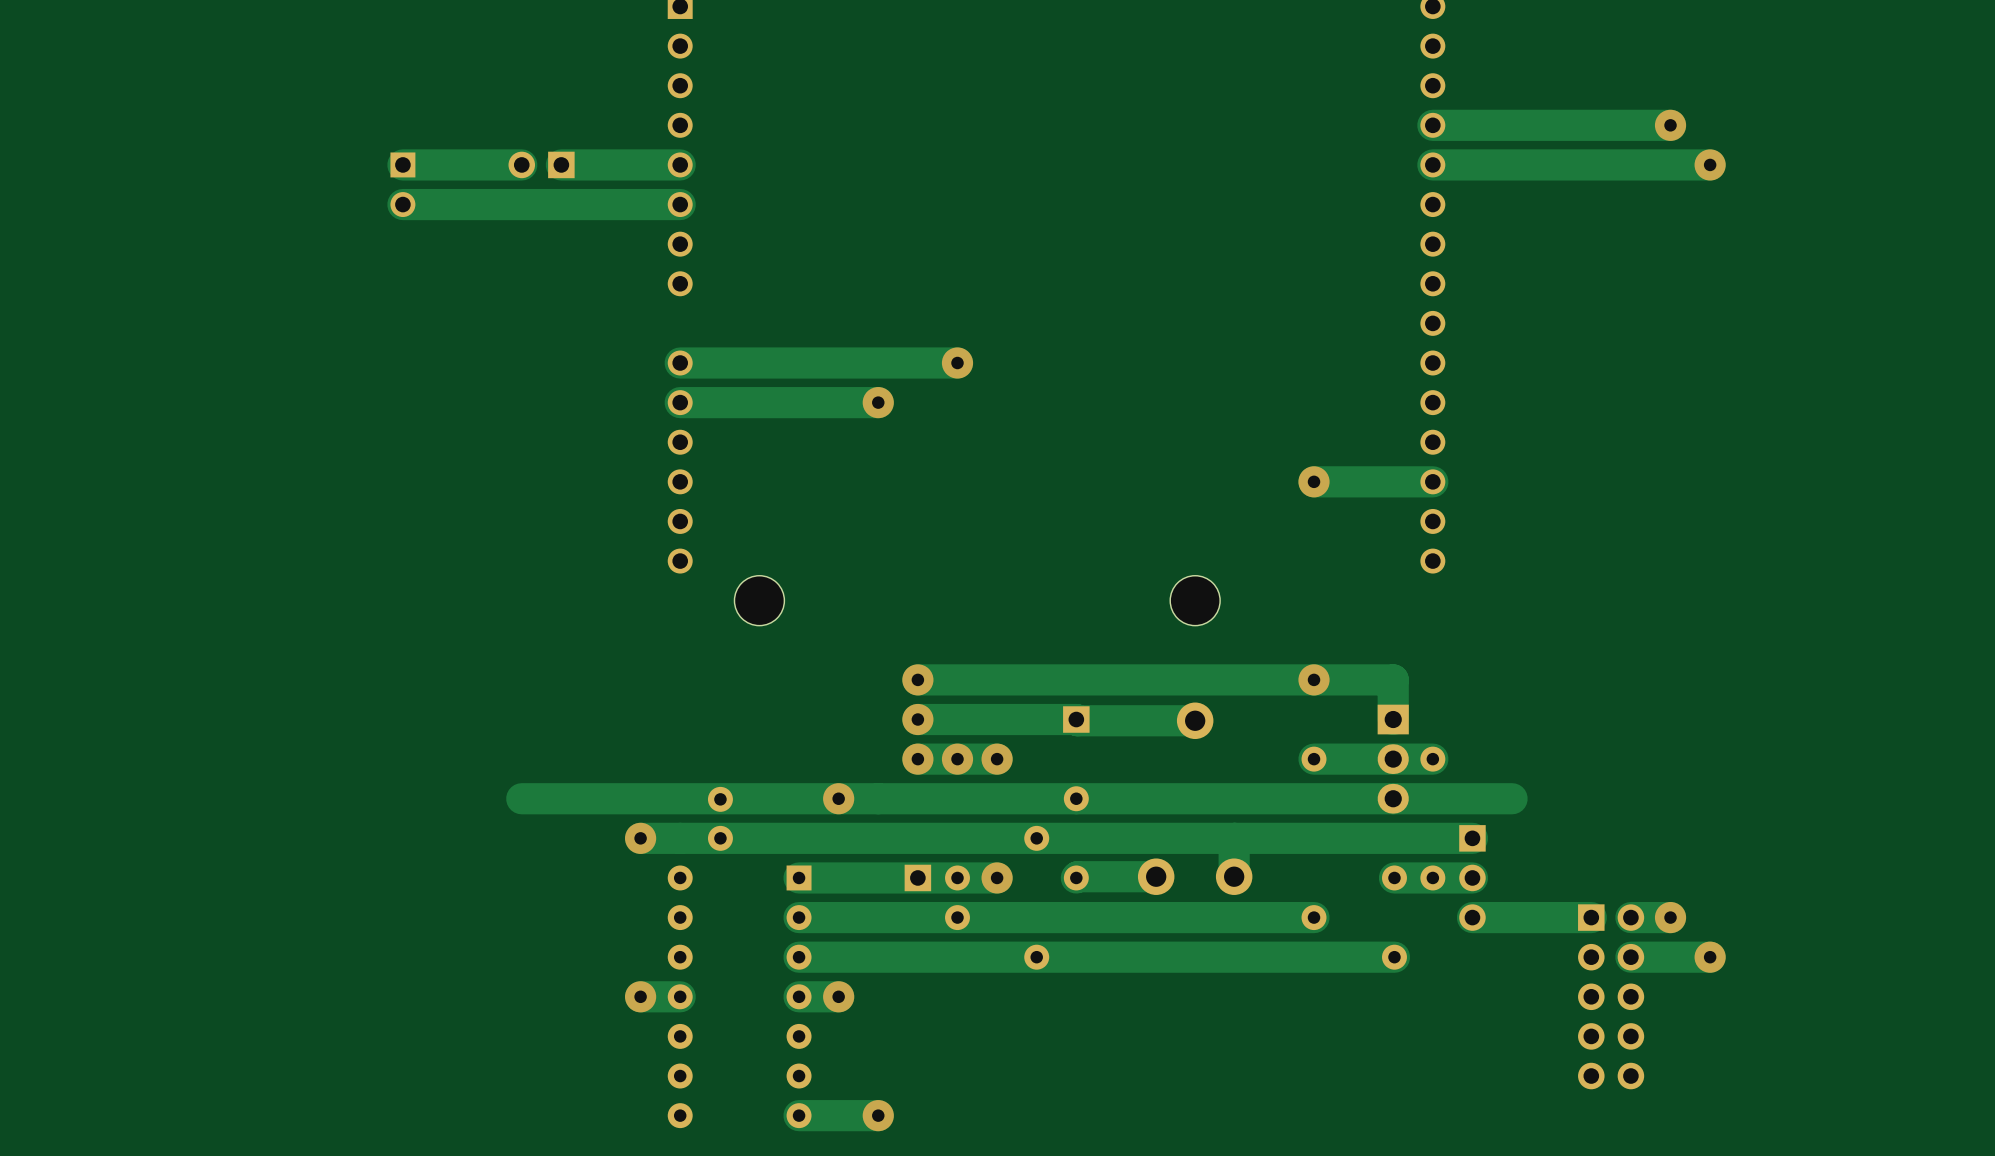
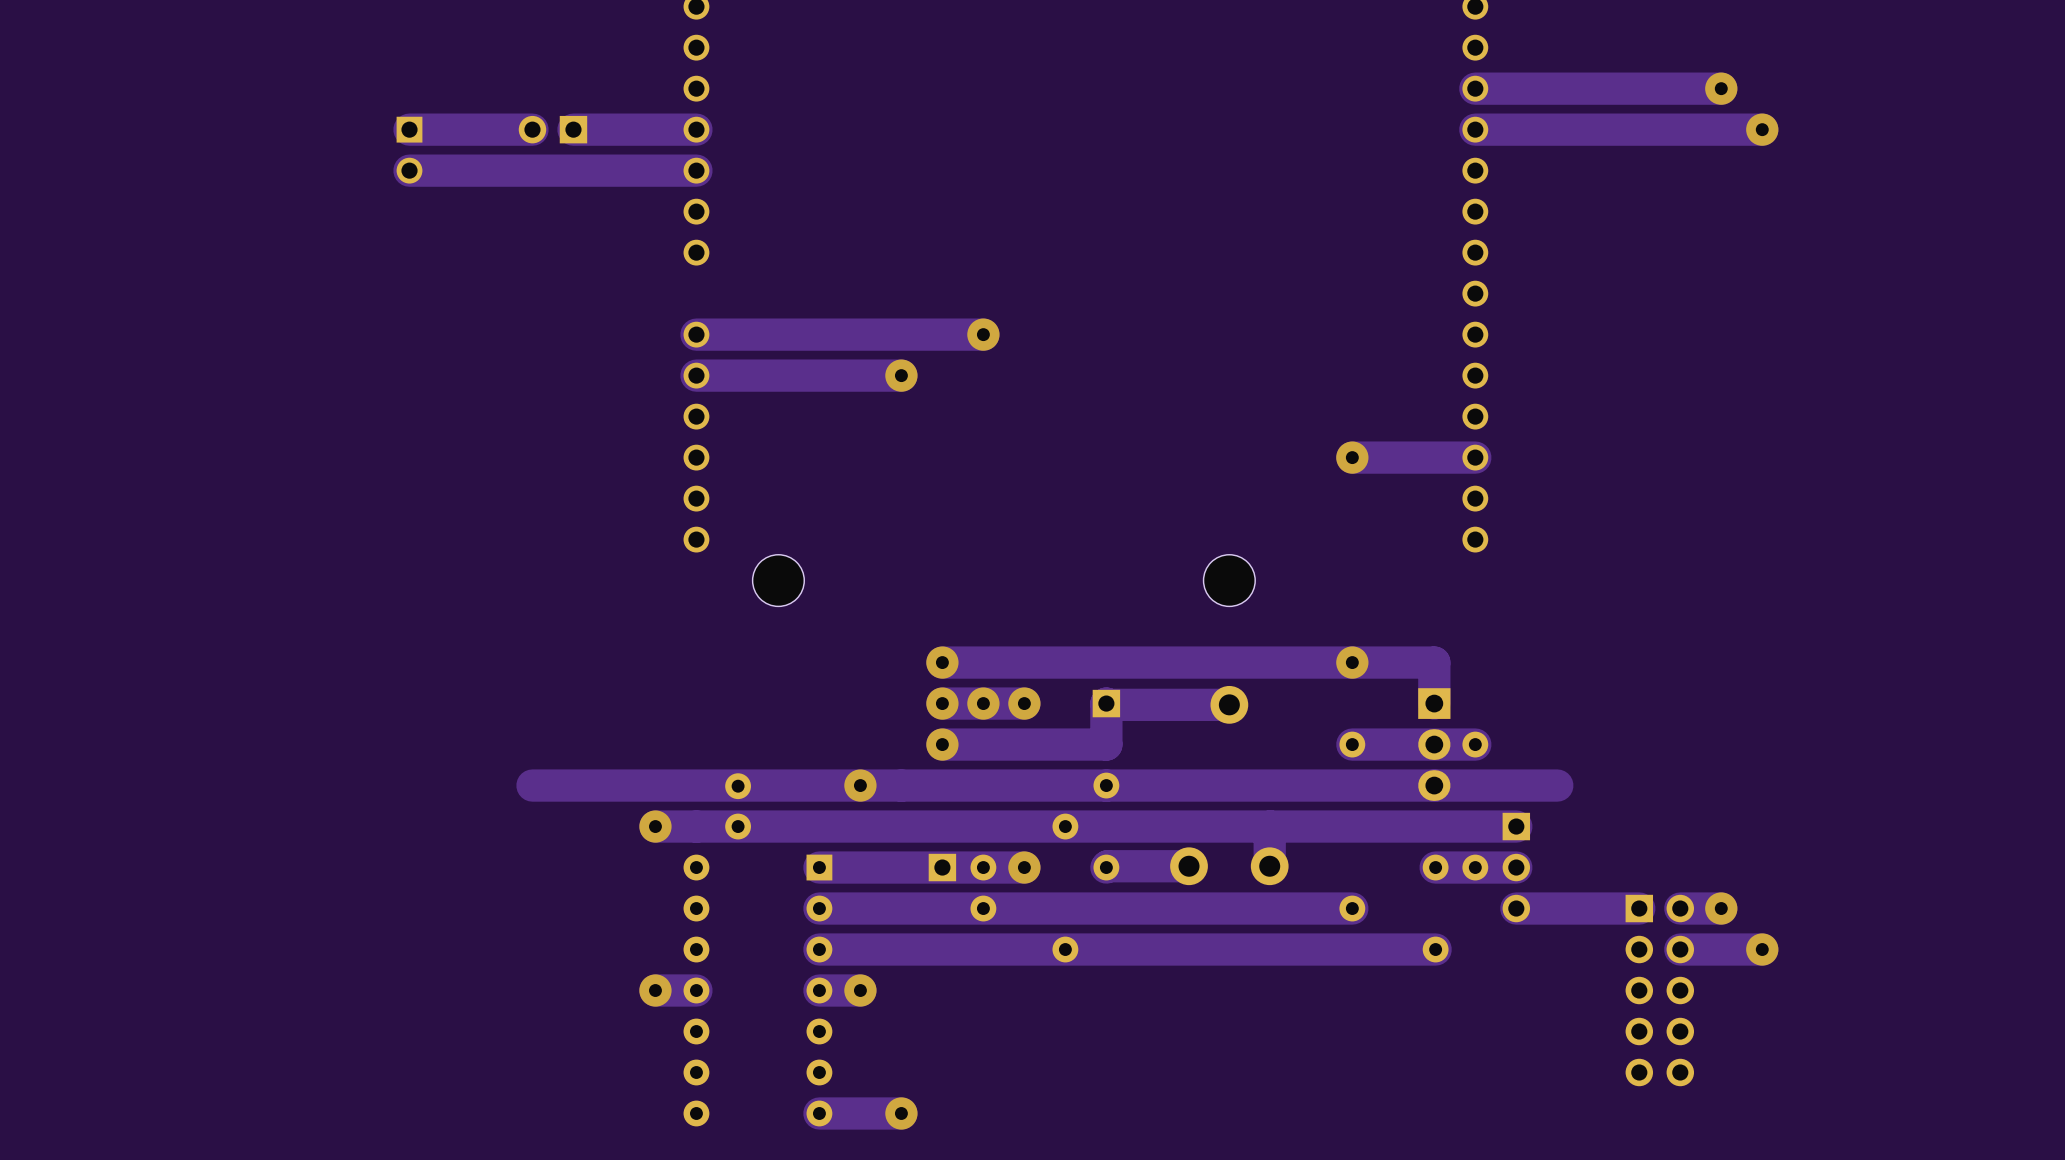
via: none -> (983, 703)
via: none -> (1024, 703)
track: (1076, 719) (997, 719) -> (1106, 703) (1106, 744) (1024, 744)
via: (957, 759) -> none
via: (997, 759) -> none

